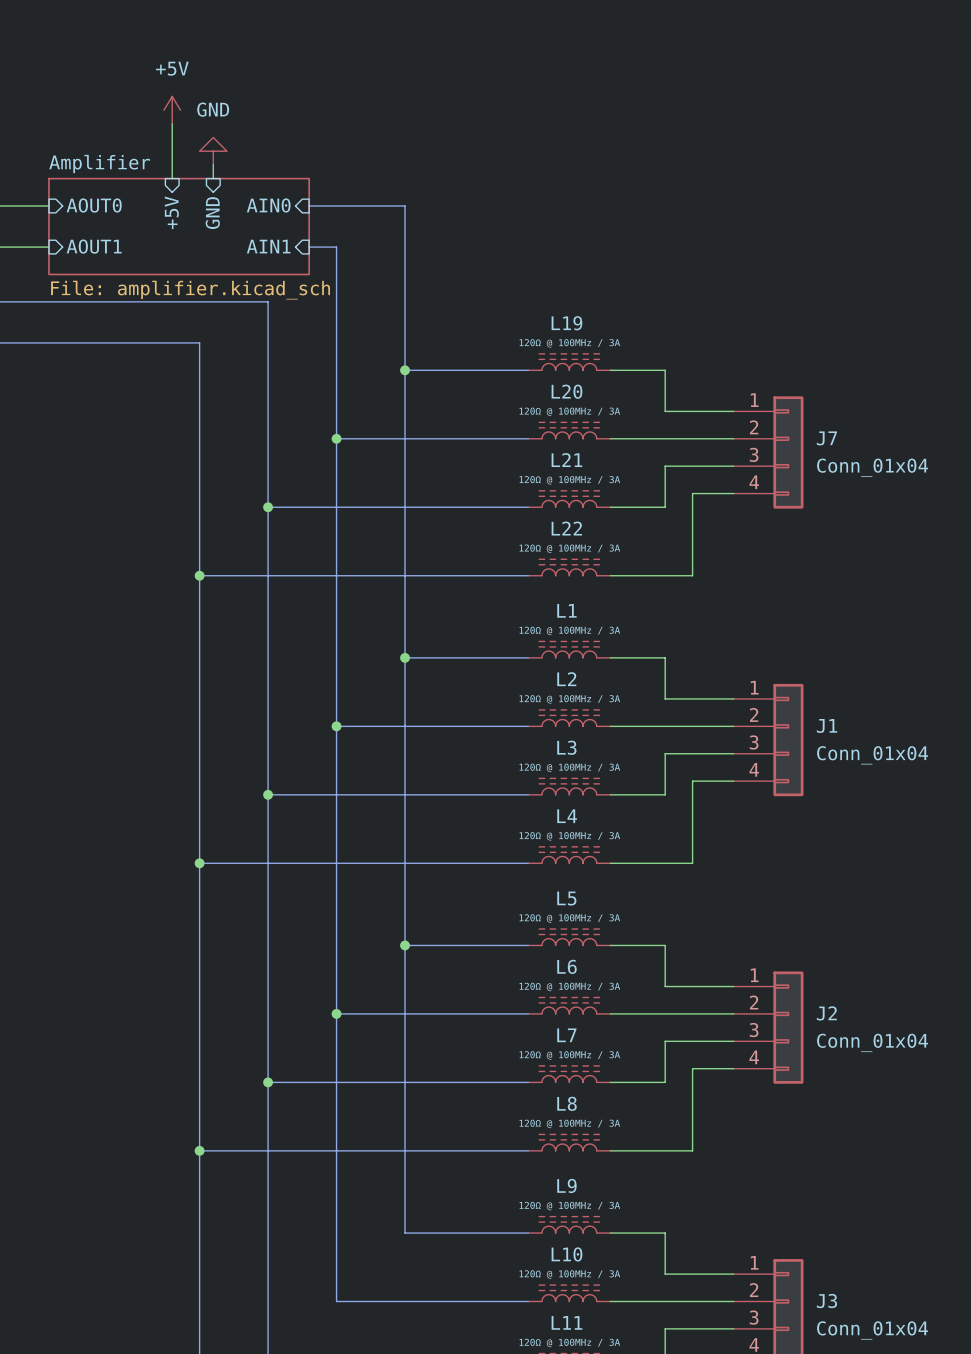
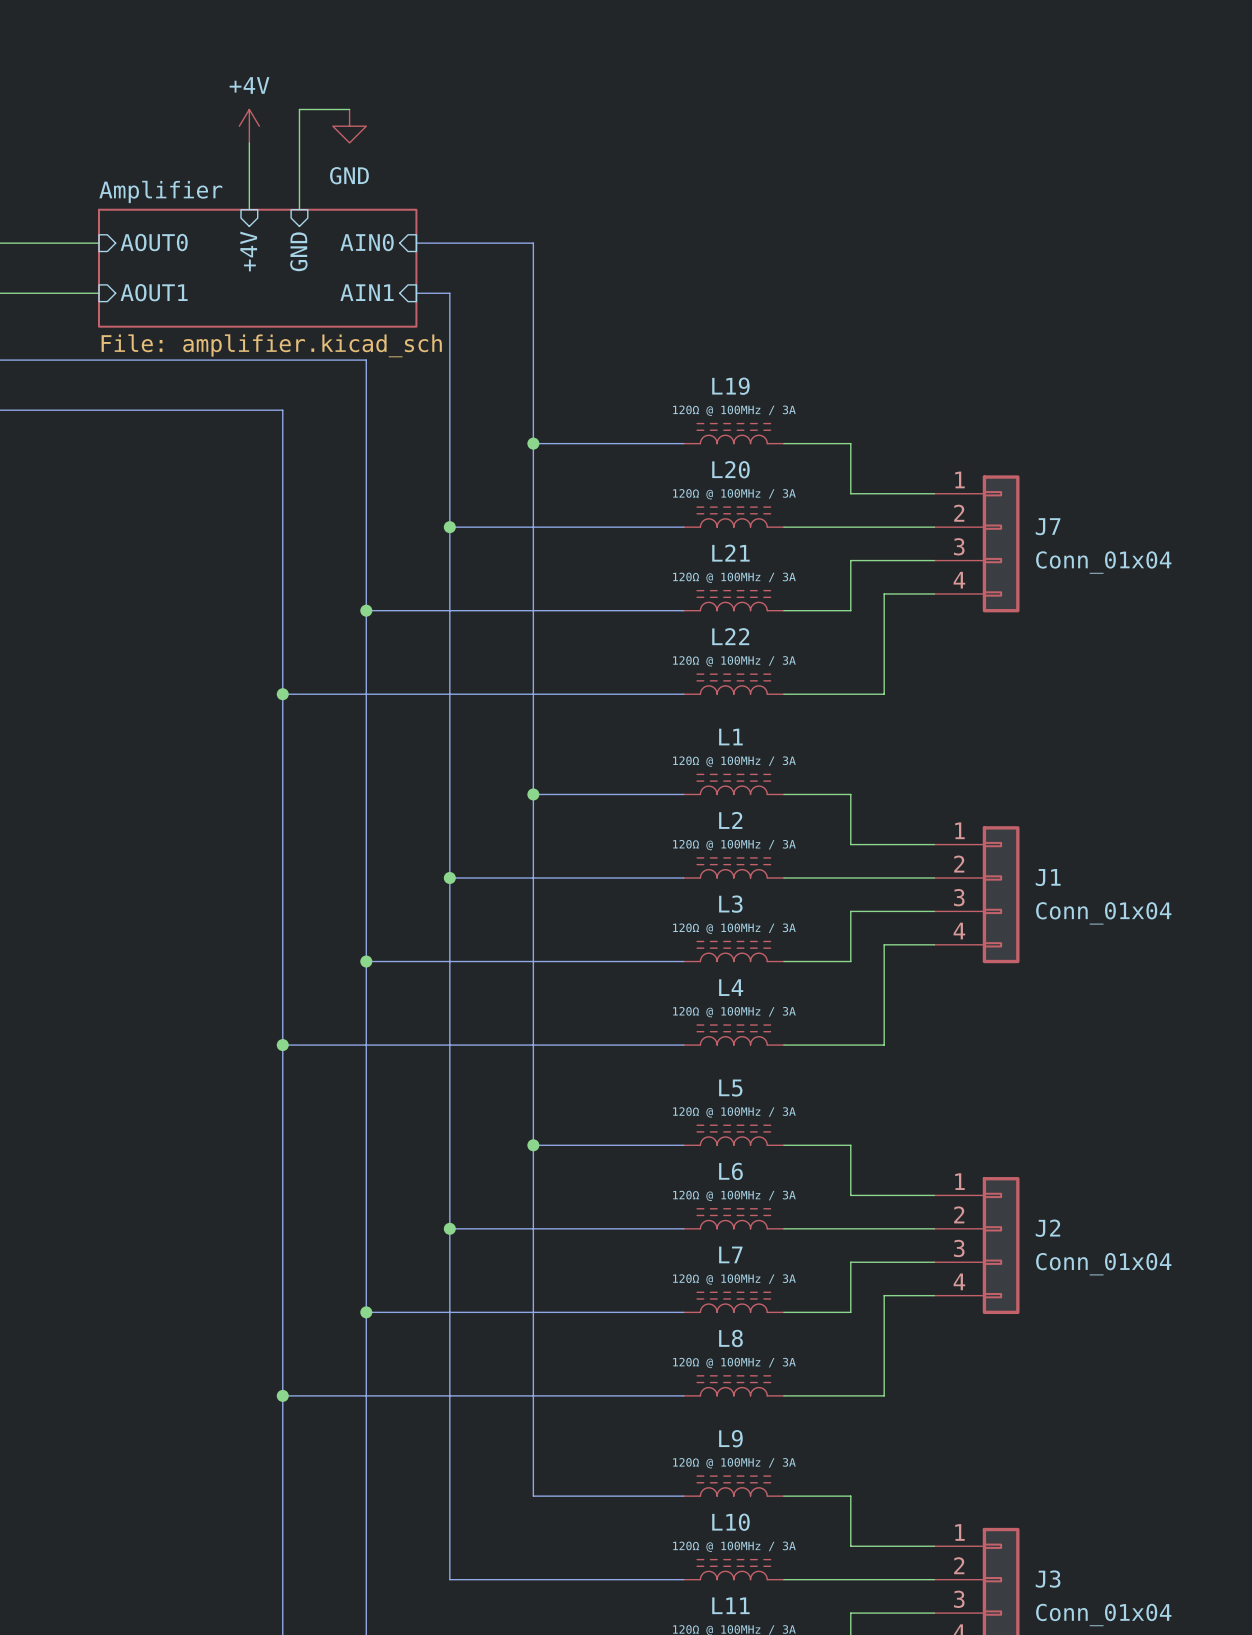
wire: none -> (349, 109) (299, 109) (299, 193)
power symbol: +5V (172, 110) -> +4V (249, 126)
power symbol rotation: 0° (213, 151) -> 180° (349, 126)
power symbol position: GND (213, 151) -> GND (349, 126)
sheet pin: +5V (171, 212) -> +4V (248, 251)

